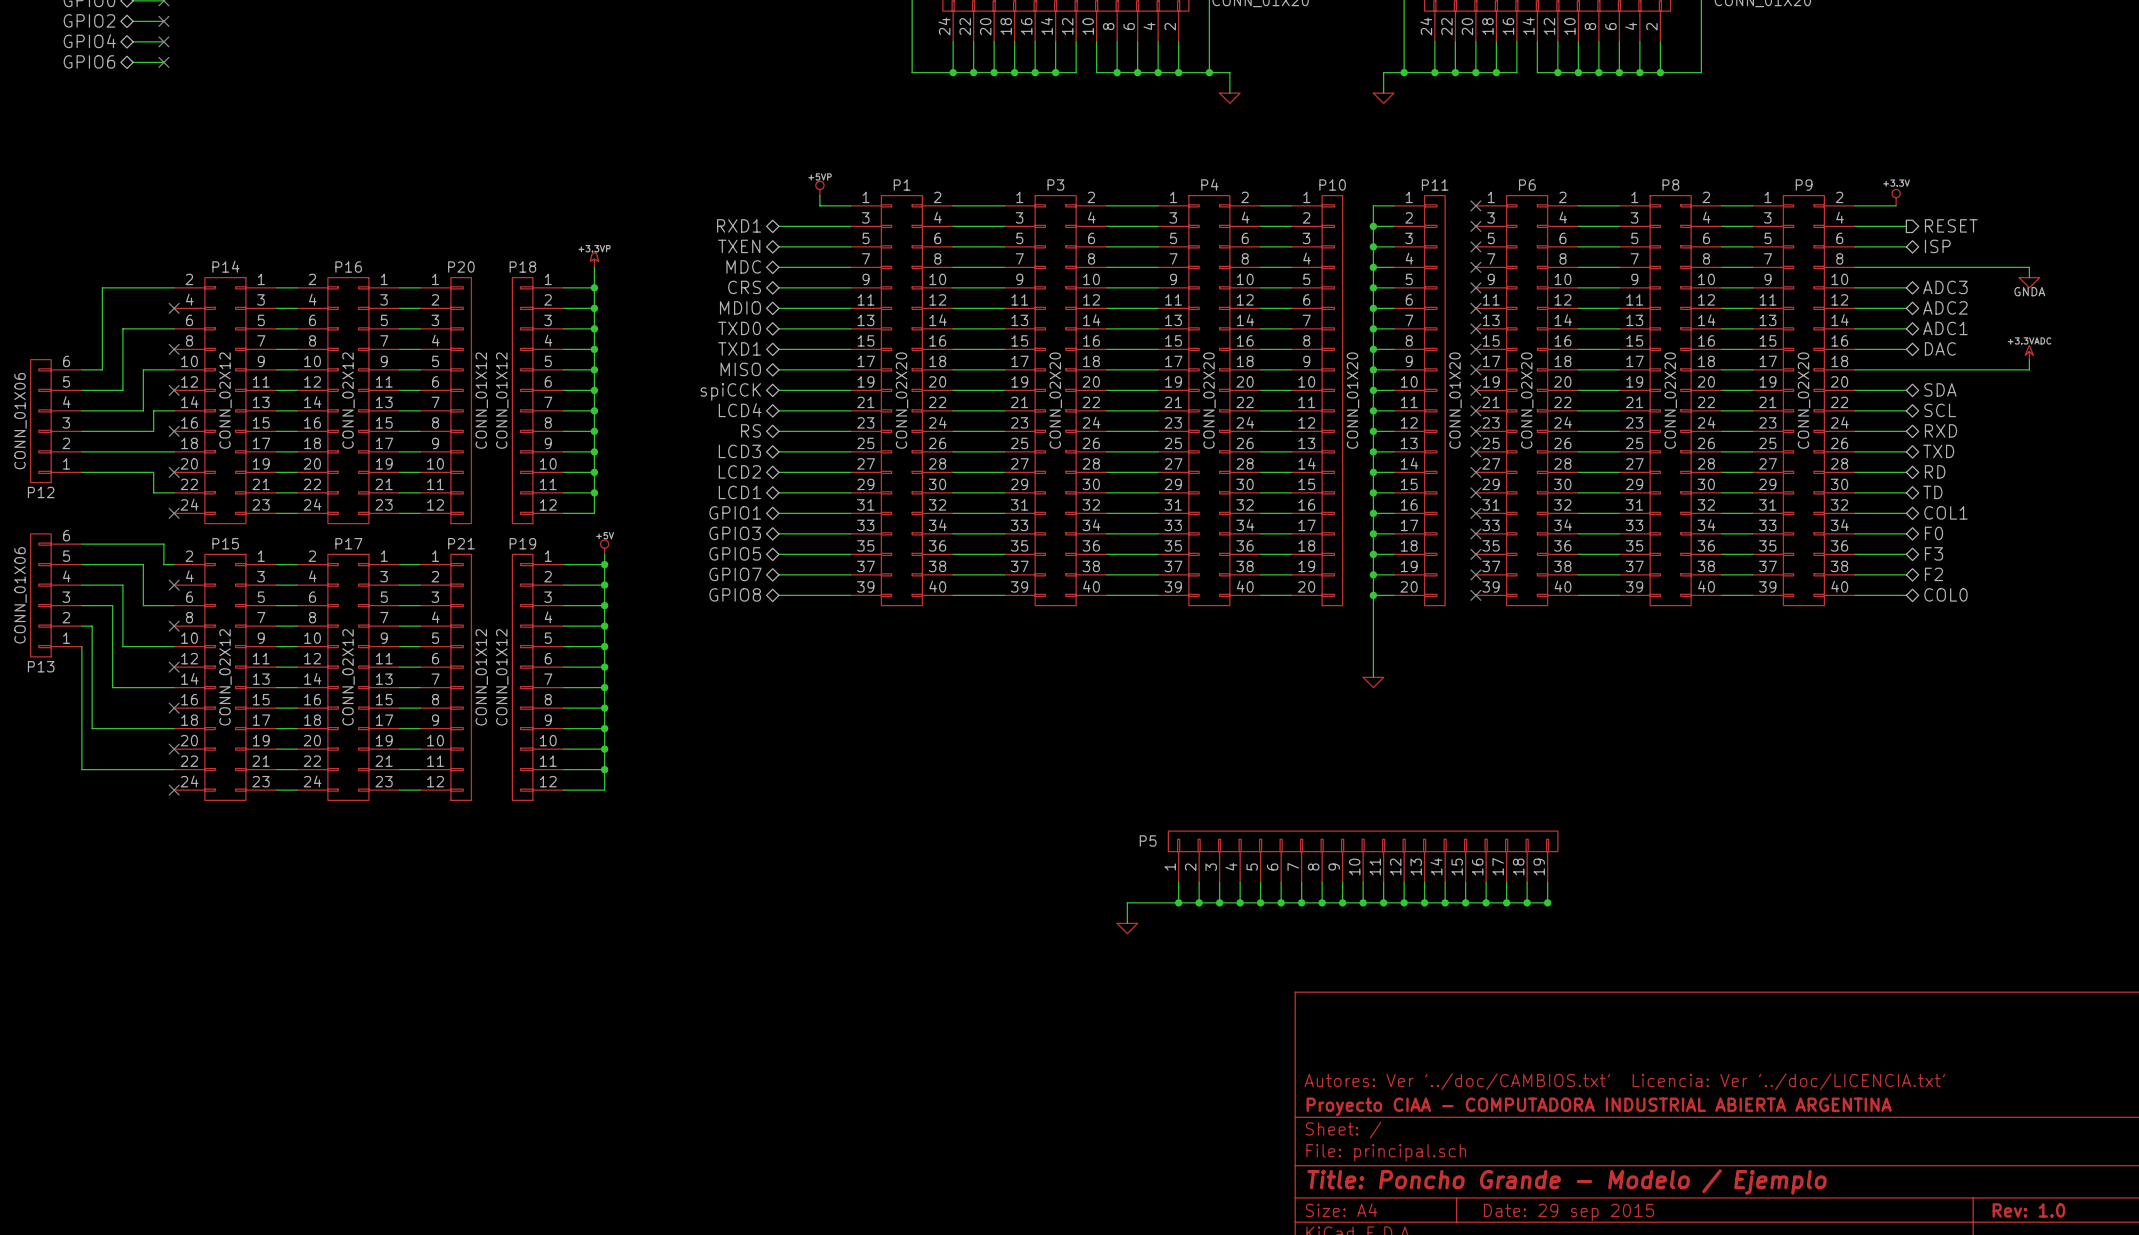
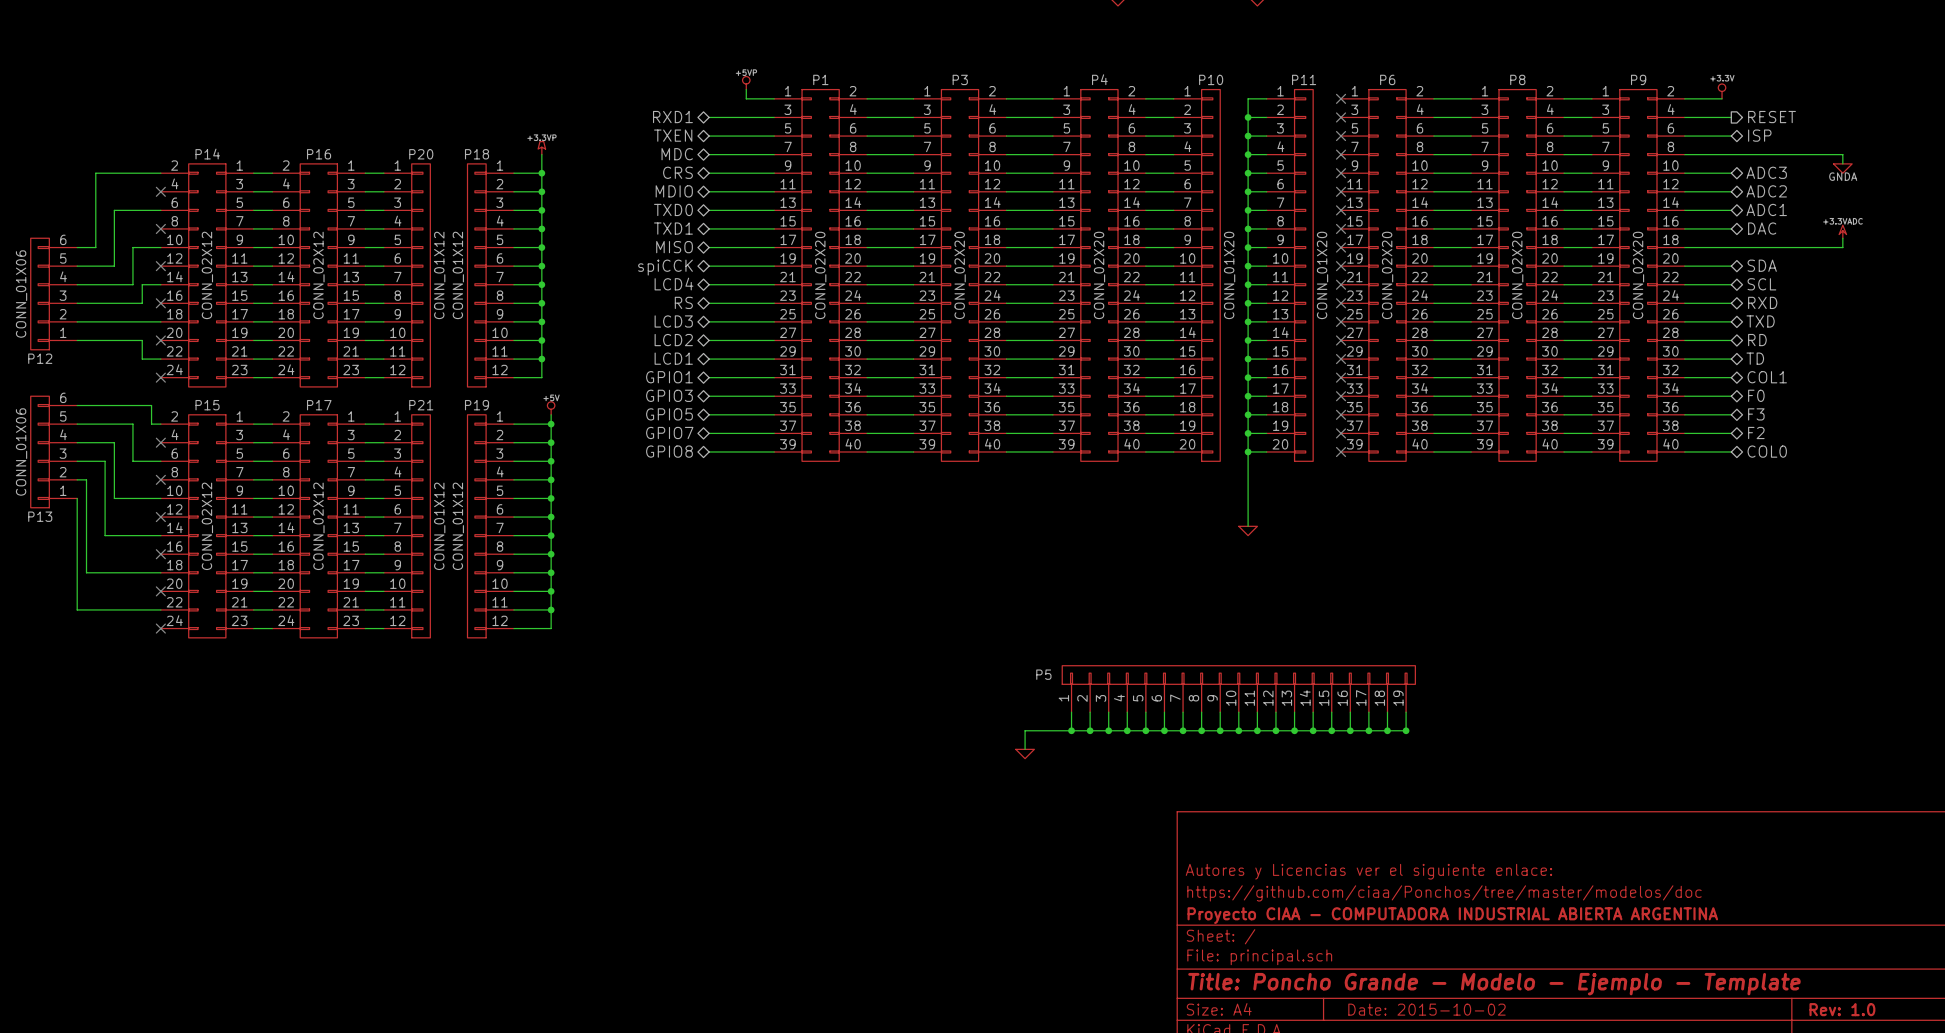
title block: none -> Autores y Licencias ver el siguiente enlace: (1368, 871)
title block: Autores: Ver '../doc/CAMBIOS.txt' Licencia: Ver '../doc/LICENCIA.txt' (1624, 1081) -> https://github.com/ciaa/Ponchos/tree/master/modelos/doc (1444, 893)
title block: Title: Poncho Grande - Modelo / Ejemplo (1567, 1181) -> Title: Poncho Grande - Modelo - Ejemplo - Template (1494, 984)
title block: Date: 29 sep 2015 (1568, 1212) -> Date: 2015-10-02 (1426, 1009)

